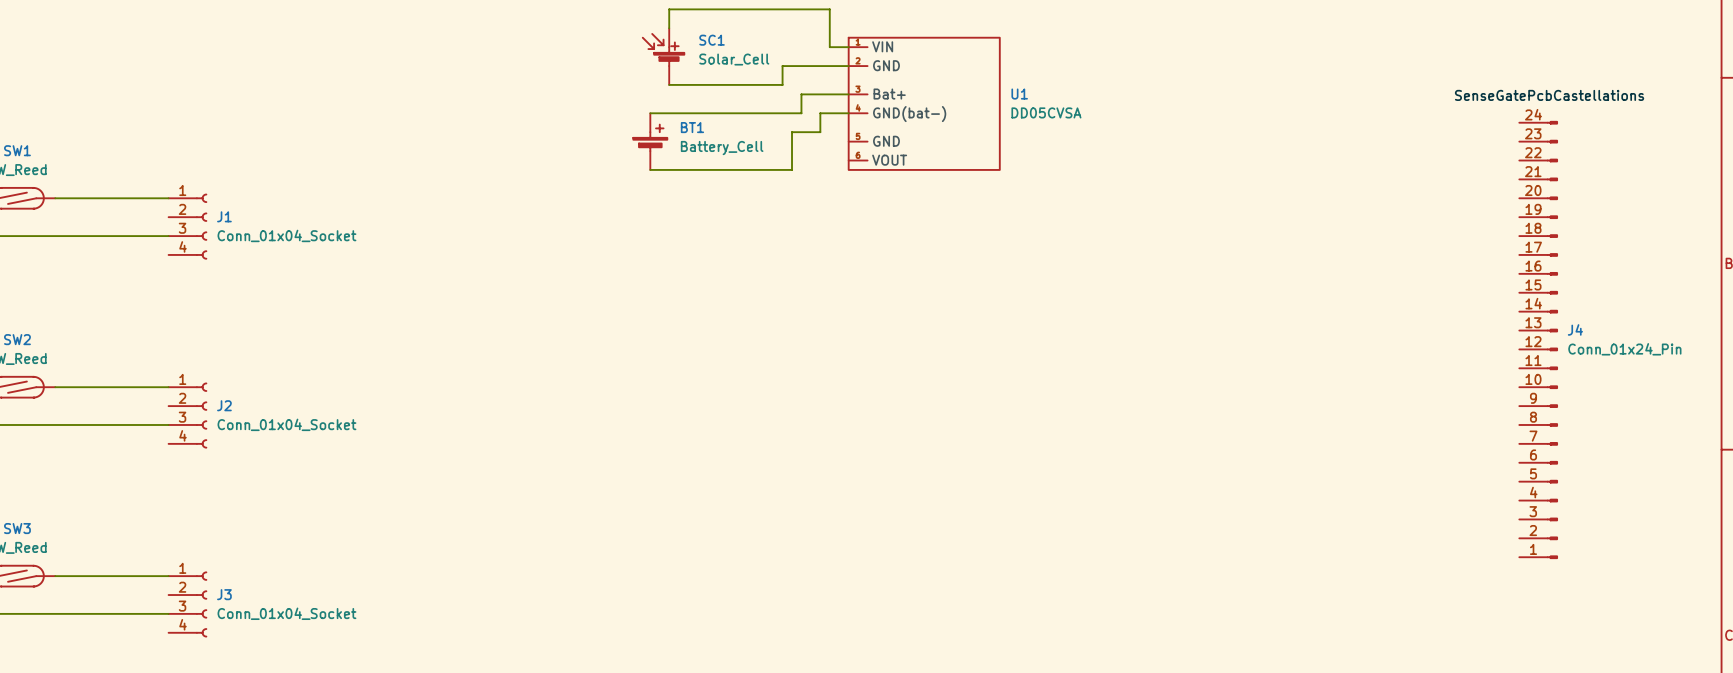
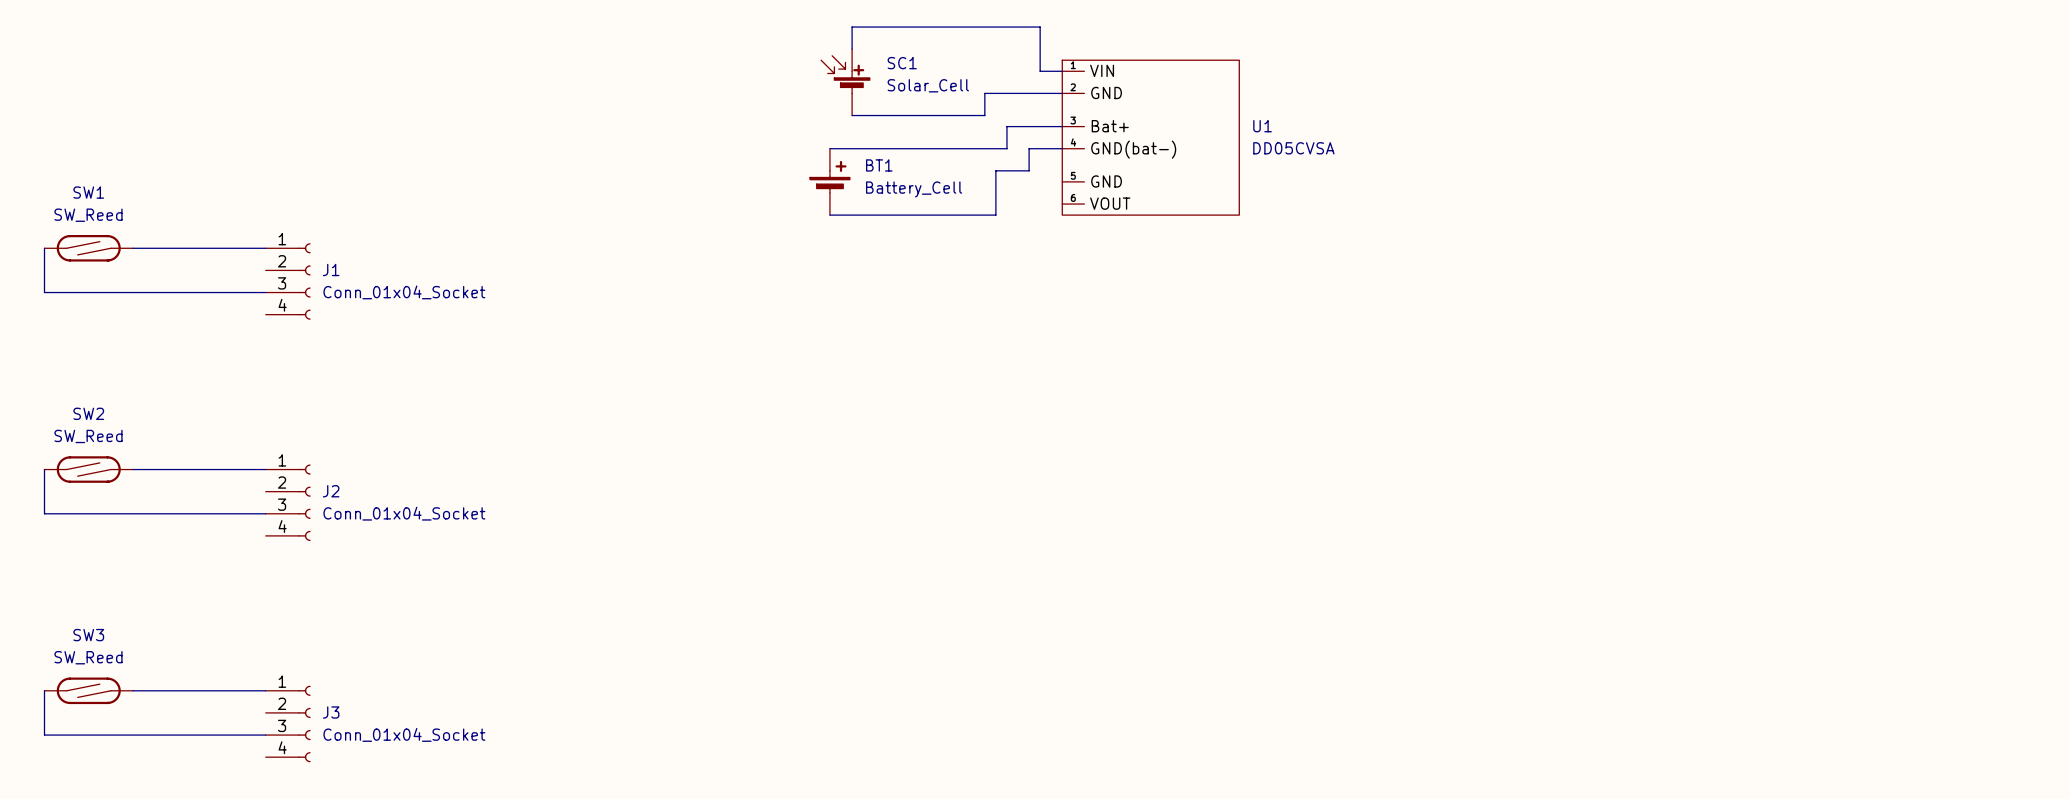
label: SenseGatePcbCastellations (1549, 95) -> none
J4: Conn_01x24_Pin (1538, 339) -> none

